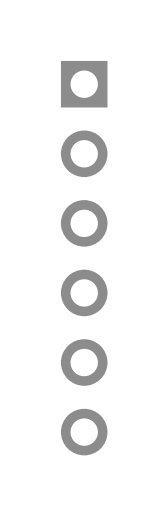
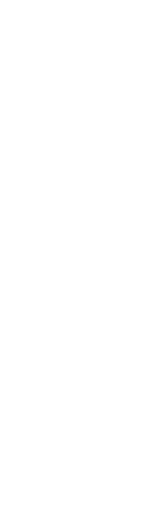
part: (84, 258) -> none

